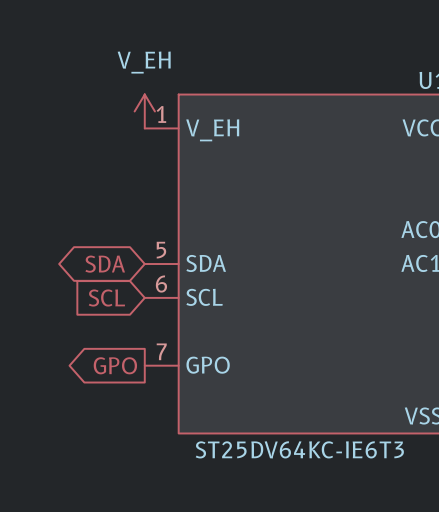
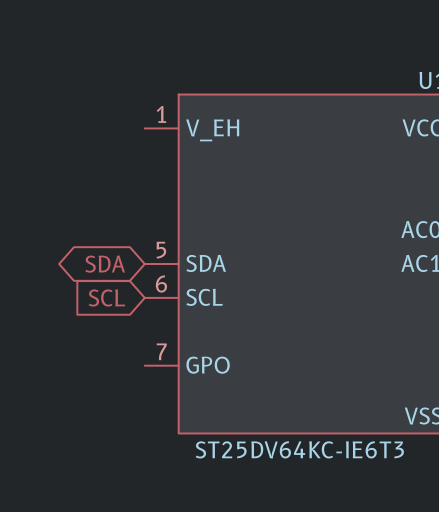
power symbol: V_EH (144, 111) -> none
global label: GPO (115, 365) -> none

